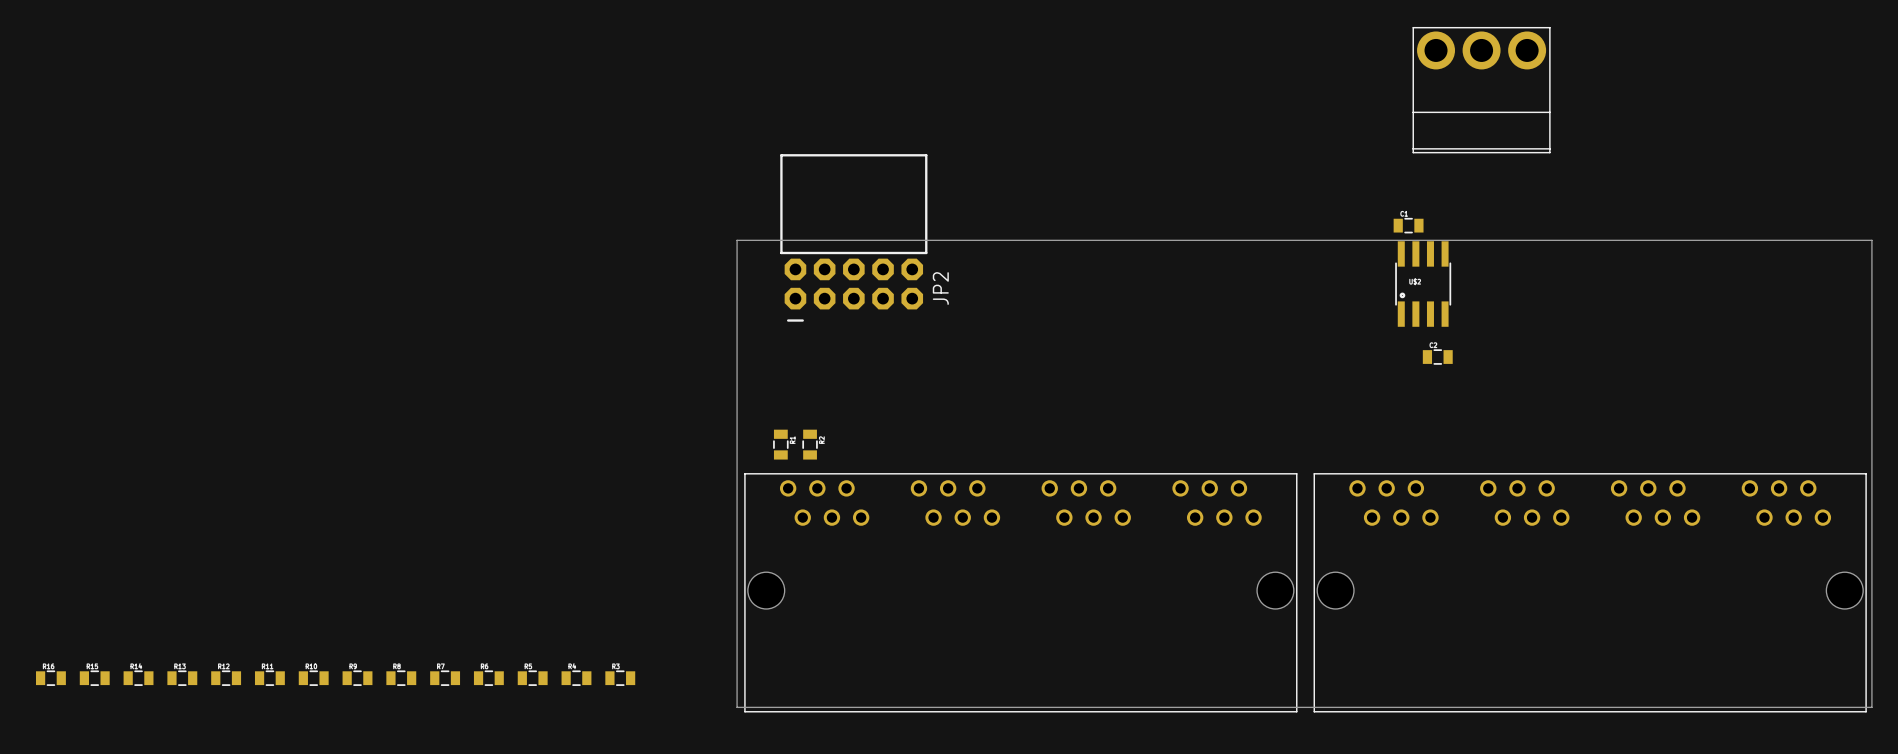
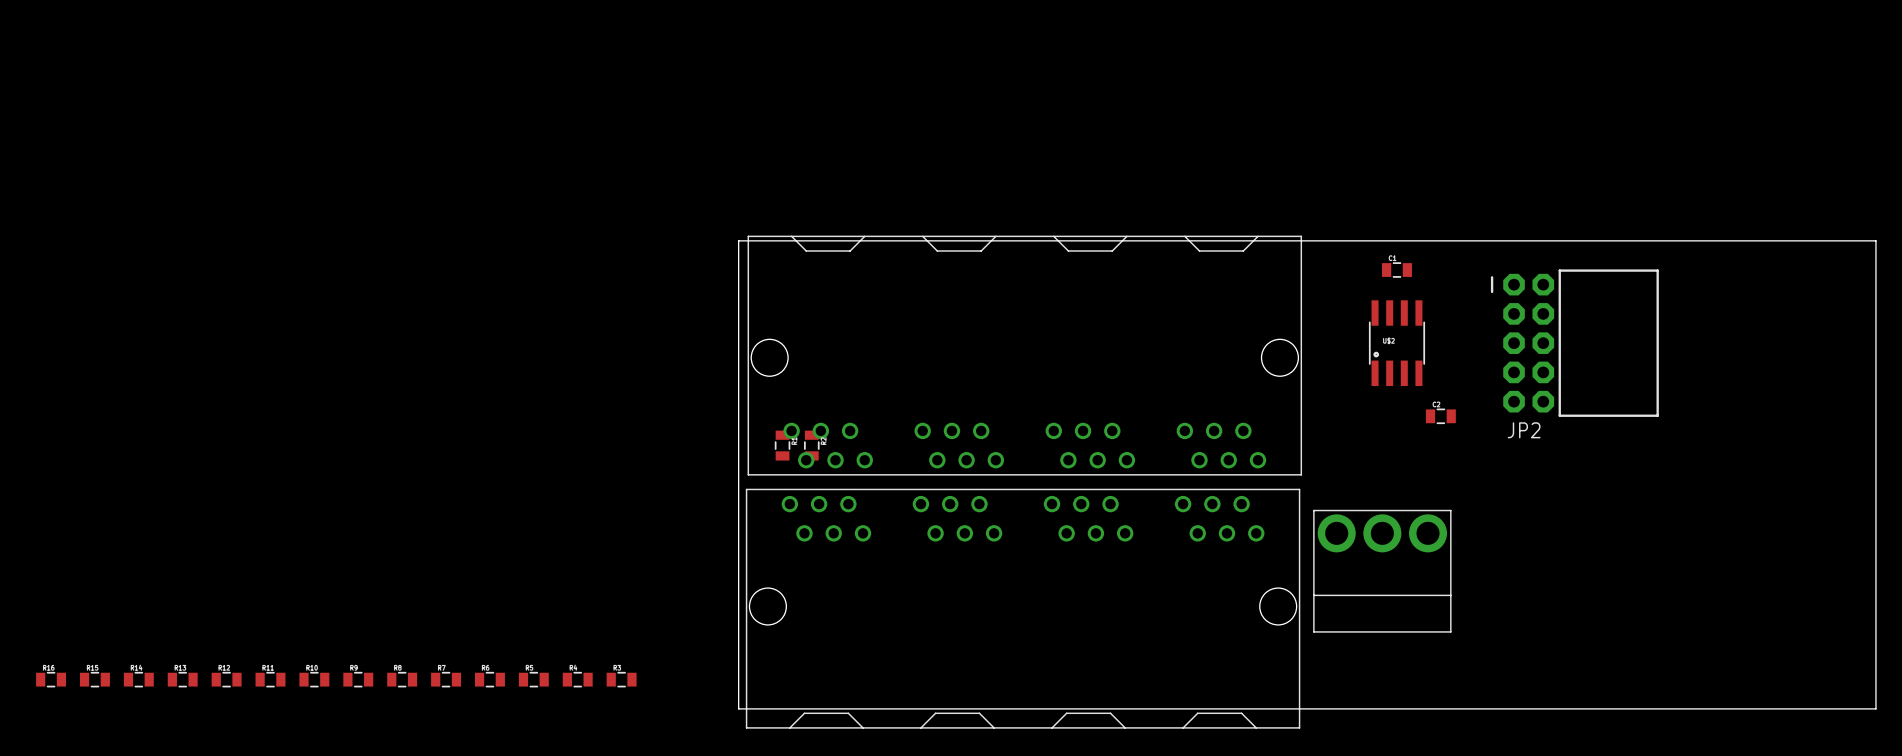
part: (1481, 90) -> none
part position: (1408, 225) -> (1396, 270)
JP2 rotation: 0° (853, 237) -> 90° clockwise (1574, 343)
JP2 position: (853, 237) -> (1574, 343)
part position: (1423, 284) -> (1396, 343)
part: none -> (1024, 355)
part position: (1437, 357) -> (1440, 416)
part: none -> (1382, 571)
part: (1020, 592) -> none
part: (1590, 592) -> none
part: none -> (1023, 608)

